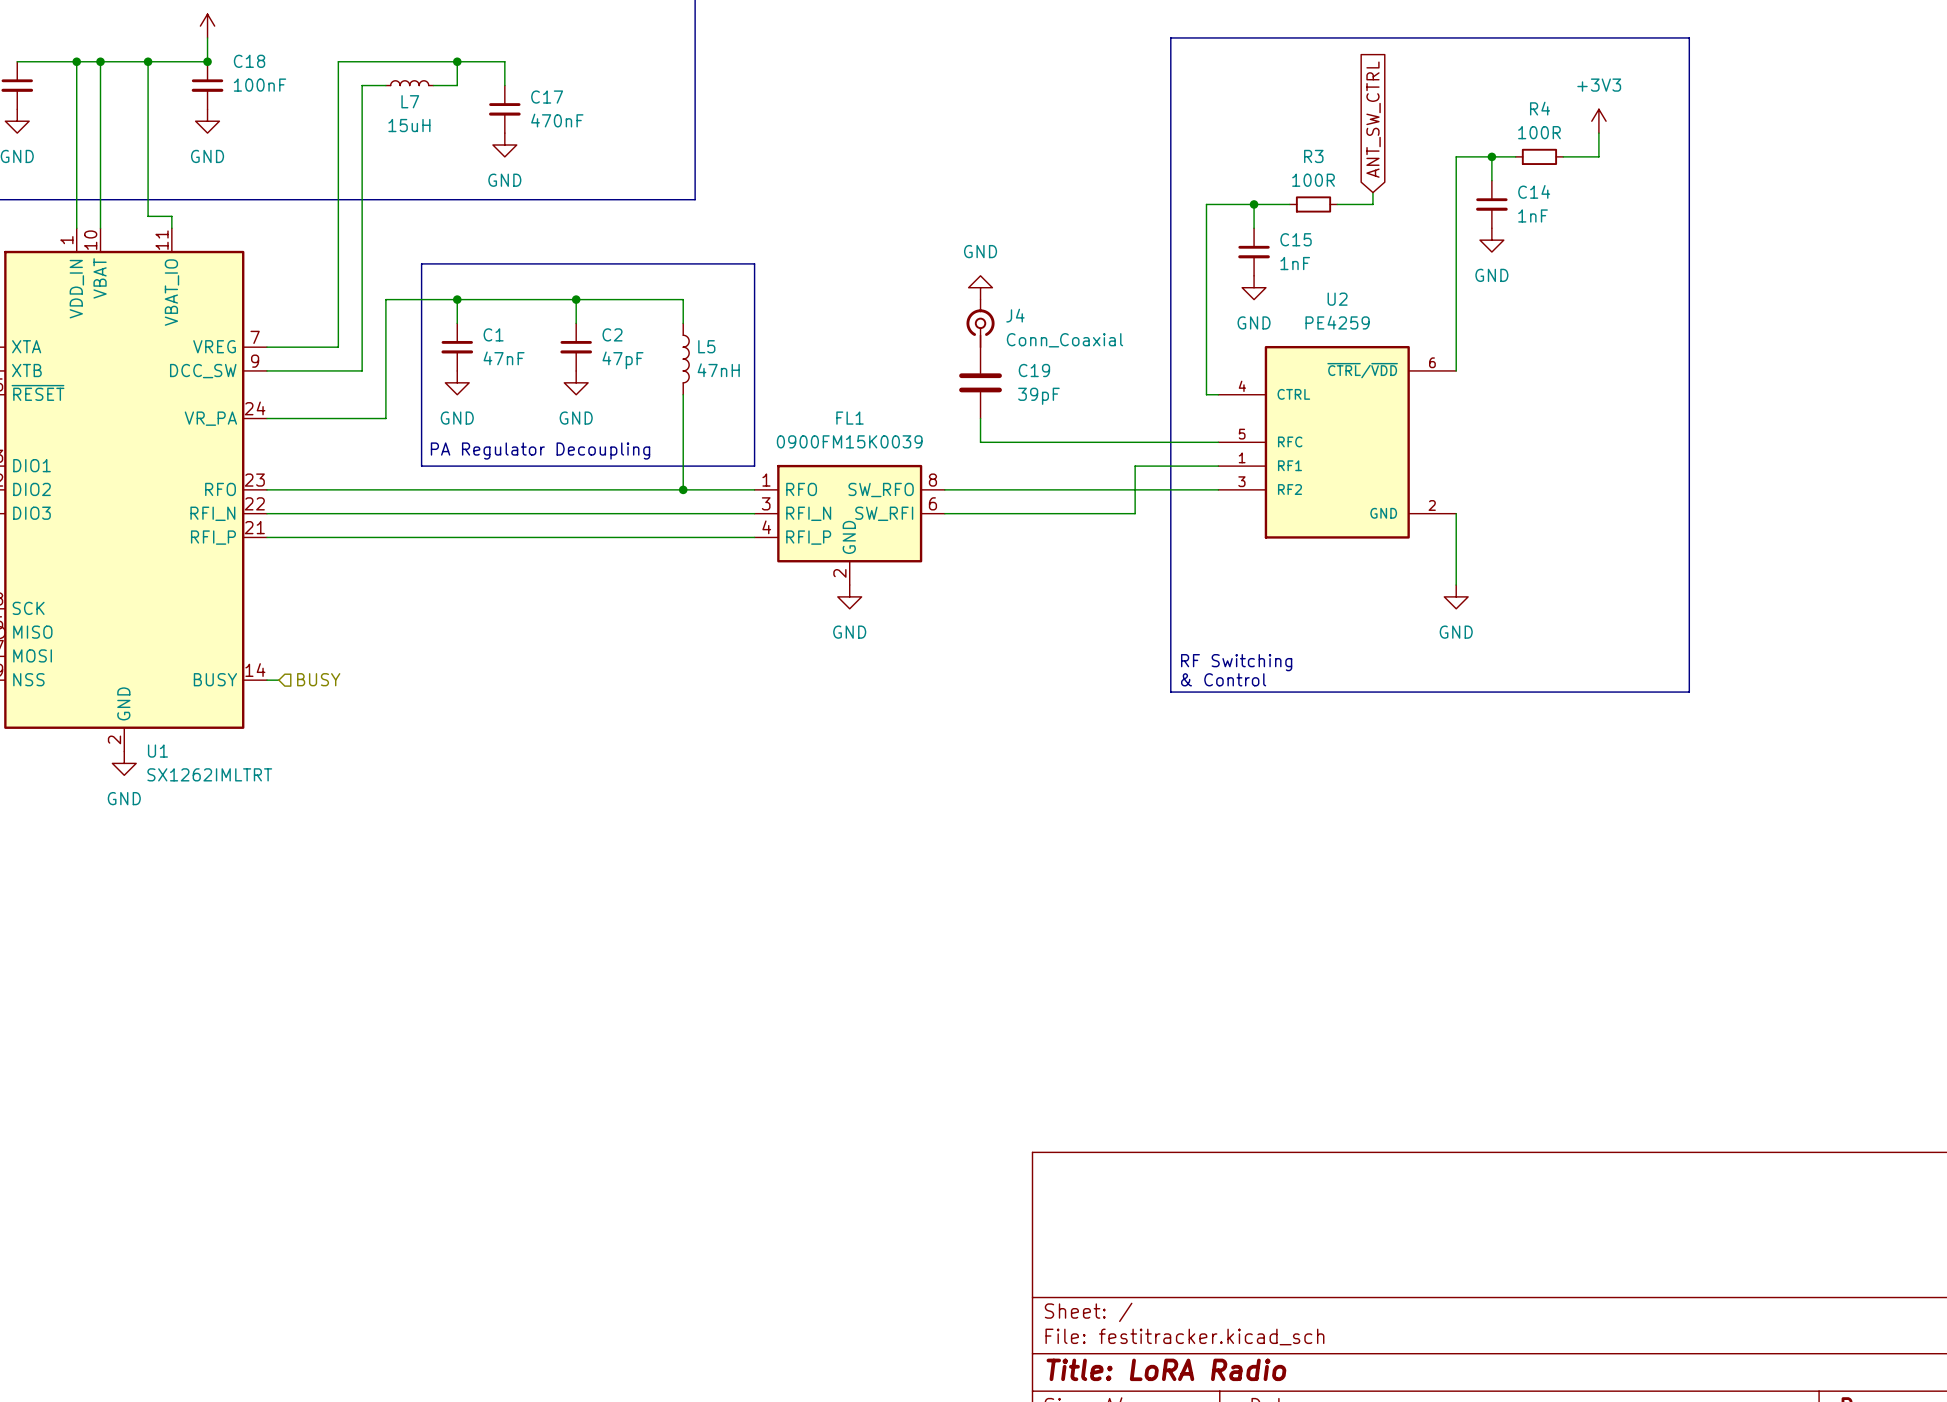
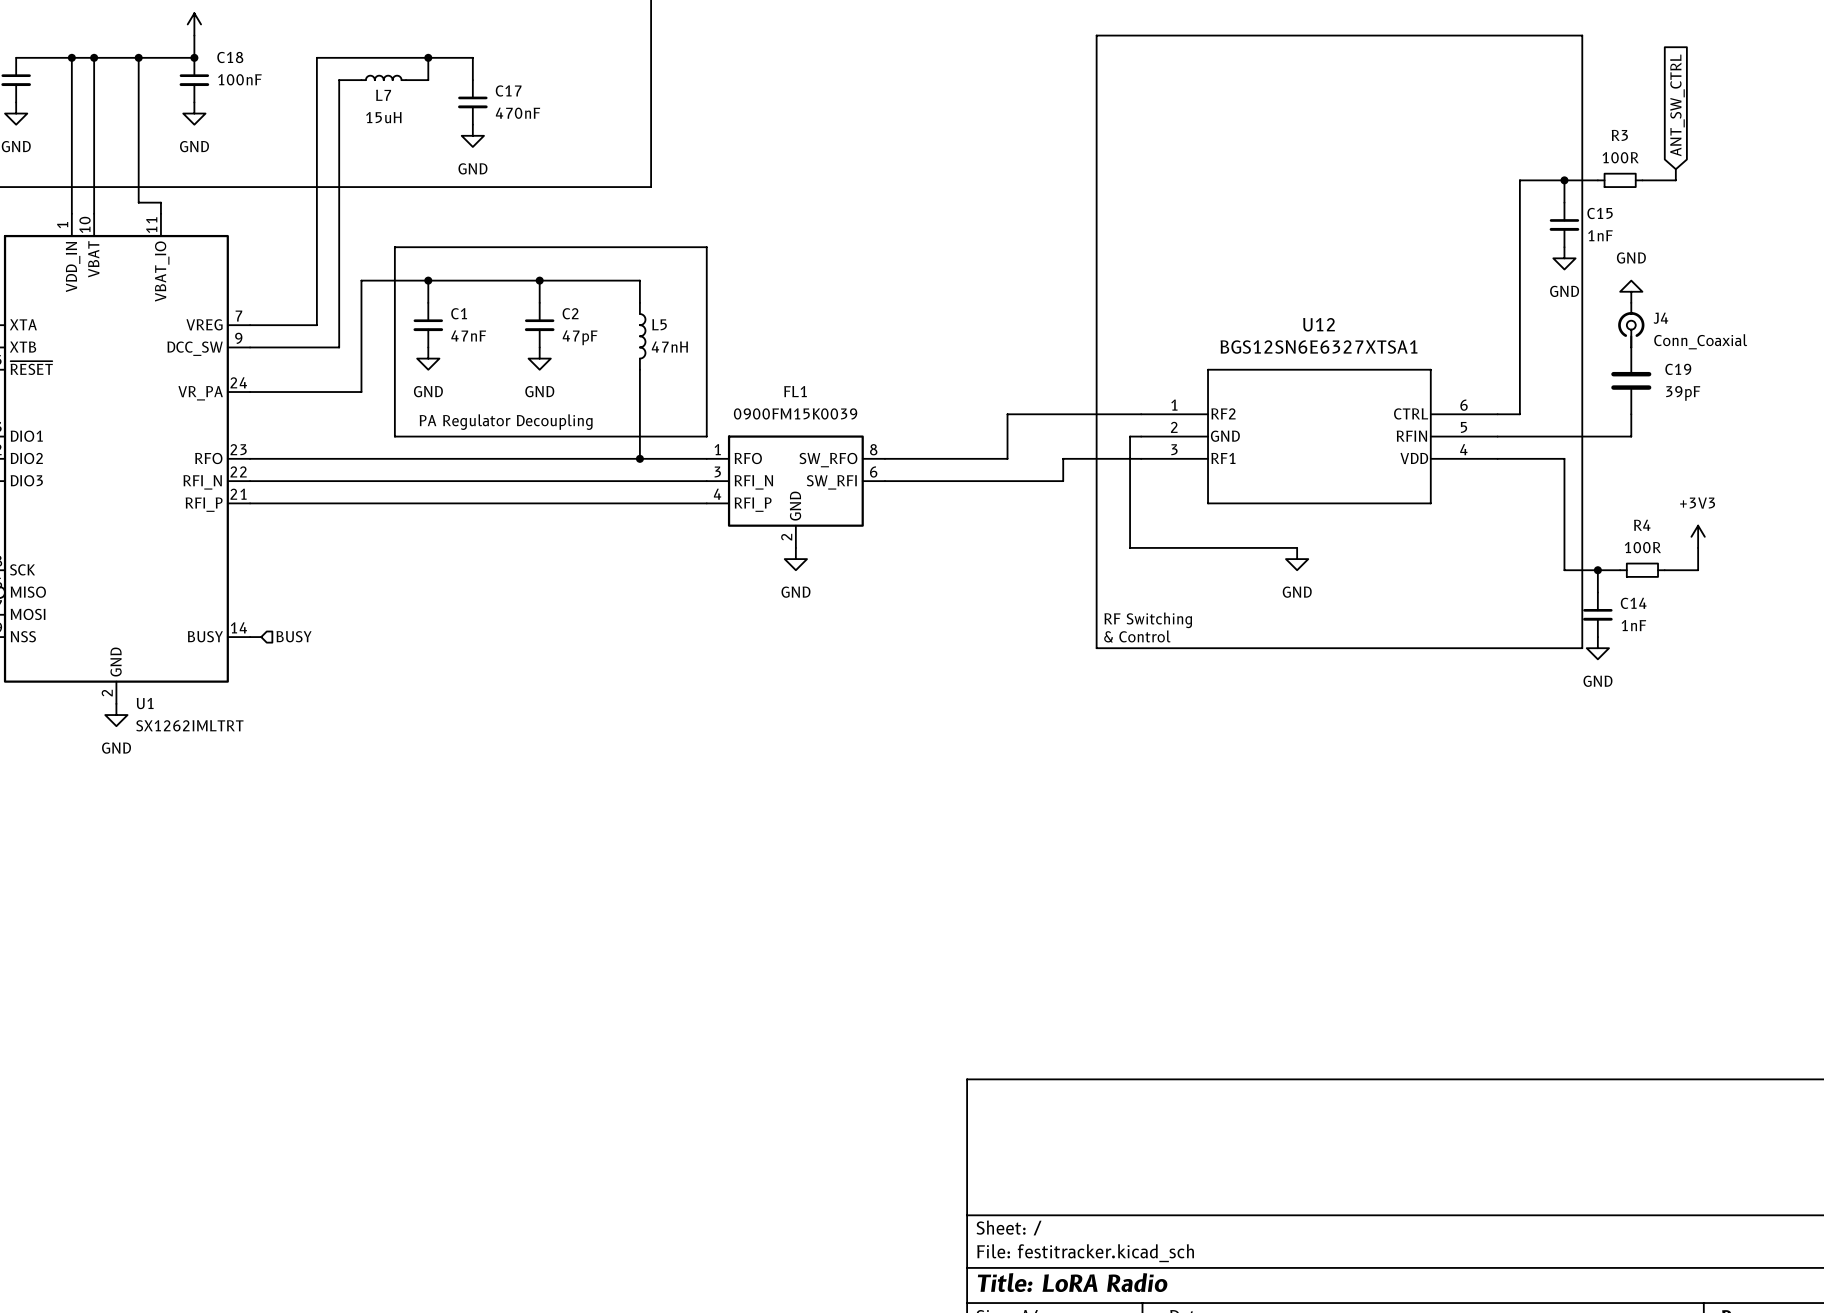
global label: none -> ANT_SW_CTRL (1677, 105)
global label: ANT_SW_CTRL (1373, 119) -> none
power symbol: +3V3 (1598, 121) -> none
wire: (1598, 133) (1598, 156) (1563, 156) -> none
wire: (1491, 156) (1491, 180) -> (1564, 180) (1564, 202)
junction: (1491, 156) -> none
wire: (1515, 156) (1456, 156) (1456, 370) -> none
R4 position: (1539, 156) -> (1642, 570)
wire: none -> (1675, 169) (1675, 180) (1642, 180)
wire: (1372, 192) (1372, 204) (1337, 204) -> none
junction: none -> (1564, 180)
wire: none -> (1597, 180) (1519, 180) (1519, 414) (1497, 414)
wire: (1254, 204) (1254, 228) -> none
junction: (1254, 204) -> none
wire: (1289, 204) (1206, 204) (1206, 394) (1218, 394) -> none
R3 position: (1313, 204) -> (1620, 180)
C14 position: (1491, 204) -> (1597, 614)
power symbol: GND (1491, 240) -> none
C15 position: (1254, 252) -> (1564, 224)
power symbol: none -> GND (1564, 258)
power symbol: GND (980, 287) -> none
power symbol: GND (1254, 287) -> none
power symbol: none -> GND (1631, 291)
J4 position: (980, 323) -> (1631, 325)
C19 position: (980, 382) -> (1631, 380)
wire: (980, 418) (980, 442) (1075, 442) -> (1007, 458) (1007, 414)
U2: PE4259 (1337, 442) -> none
wire: none -> (1631, 414) (1631, 436) (1497, 436)
wire: (1206, 466) (1135, 466) (1135, 489) (1075, 489) -> (1130, 436) (1130, 547) (1297, 547)
U12: none -> BGS12SN6E6327XTSA1 (1319, 436)
wire: none -> (1497, 458) (1564, 458) (1564, 570) (1620, 570)
wire: (1456, 513) (1456, 585) -> none
power symbol: none -> +3V3 (1698, 536)
wire: none -> (1698, 547) (1698, 570) (1664, 570)
power symbol position: GND (1456, 596) -> GND (1297, 559)
wire: none -> (1597, 570) (1597, 592)
junction: none -> (1597, 570)
power symbol: none -> GND (1597, 648)

